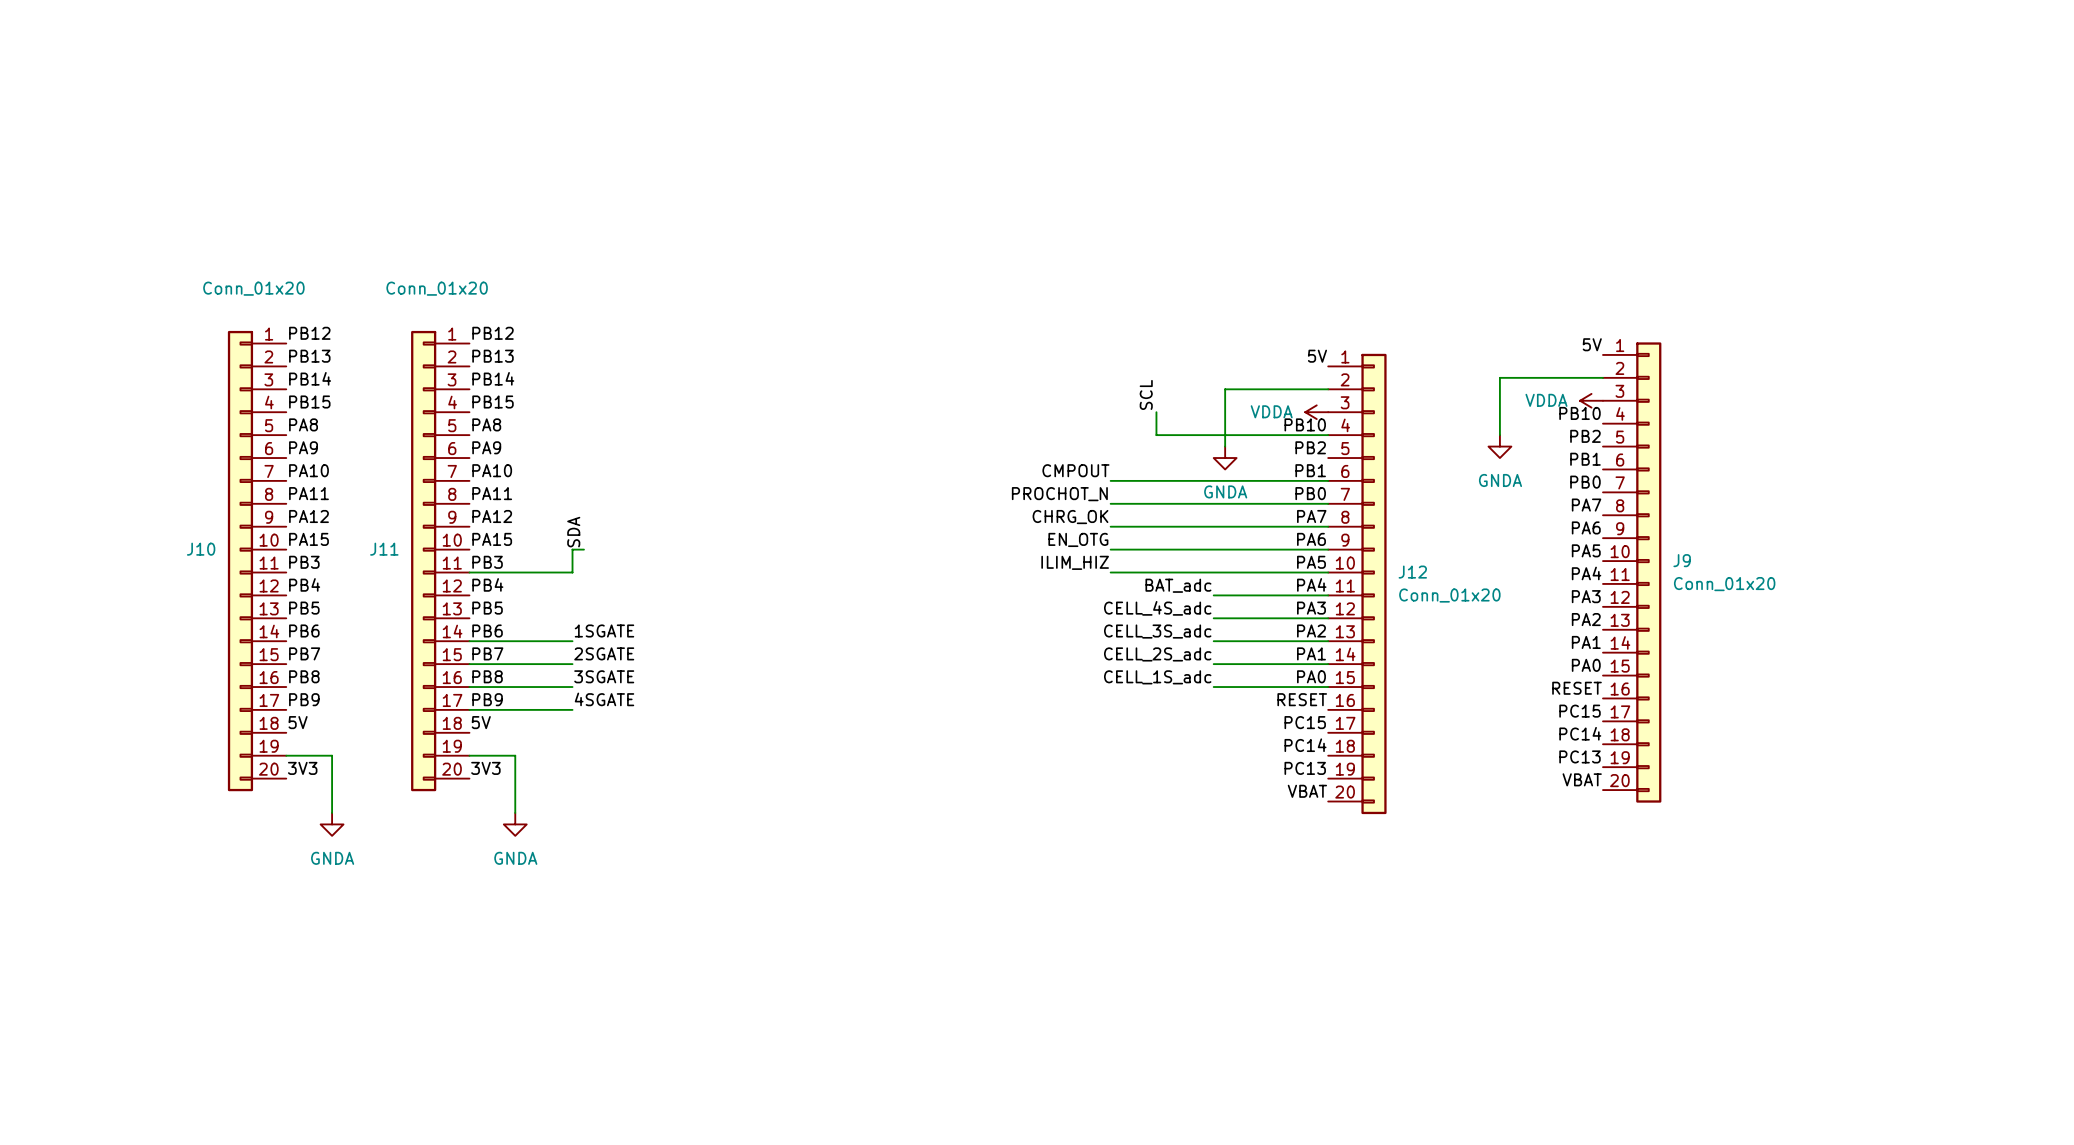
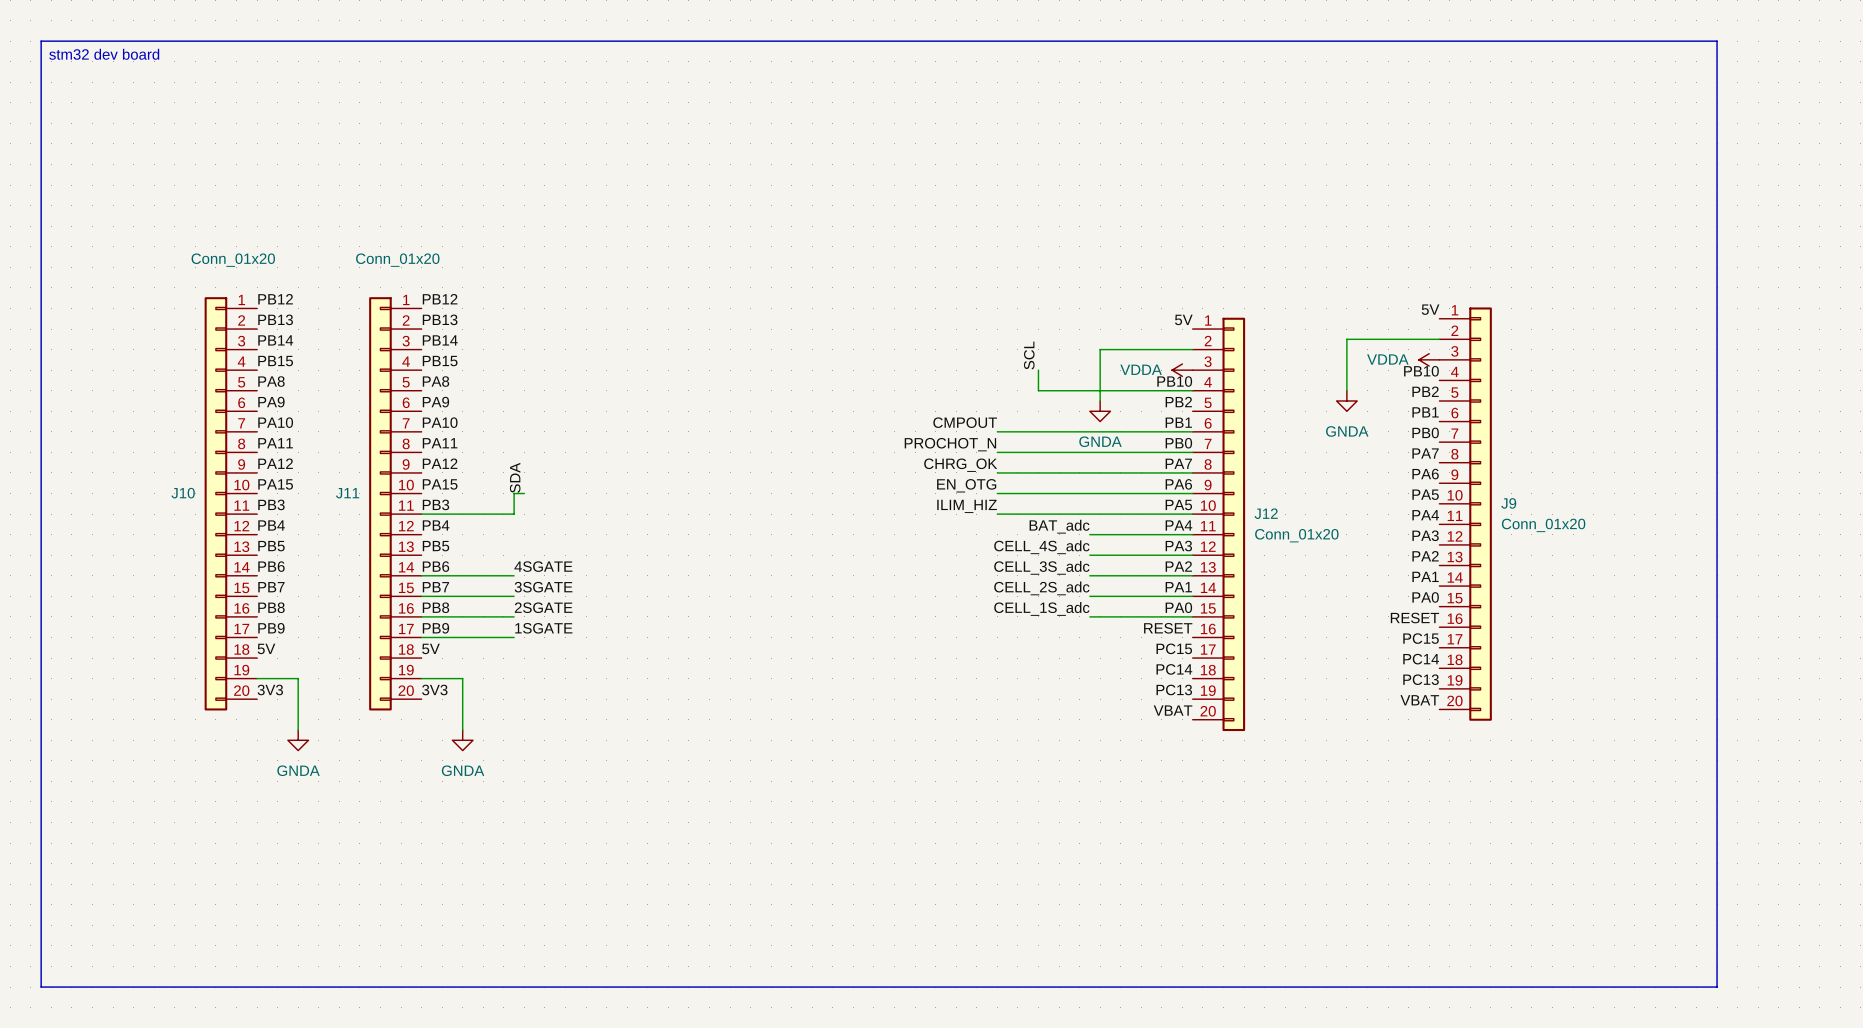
line: none -> (41, 41) (1717, 41) (1717, 987) (41, 987) (41, 41)
text: none -> stm32 dev board (104, 54)
label: 1SGATE (604, 630) -> 4SGATE (543, 566)
label: 2SGATE (604, 653) -> 3SGATE (543, 587)
label: 3SGATE (604, 676) -> 2SGATE (543, 607)
label: 4SGATE (604, 699) -> 1SGATE (543, 628)

